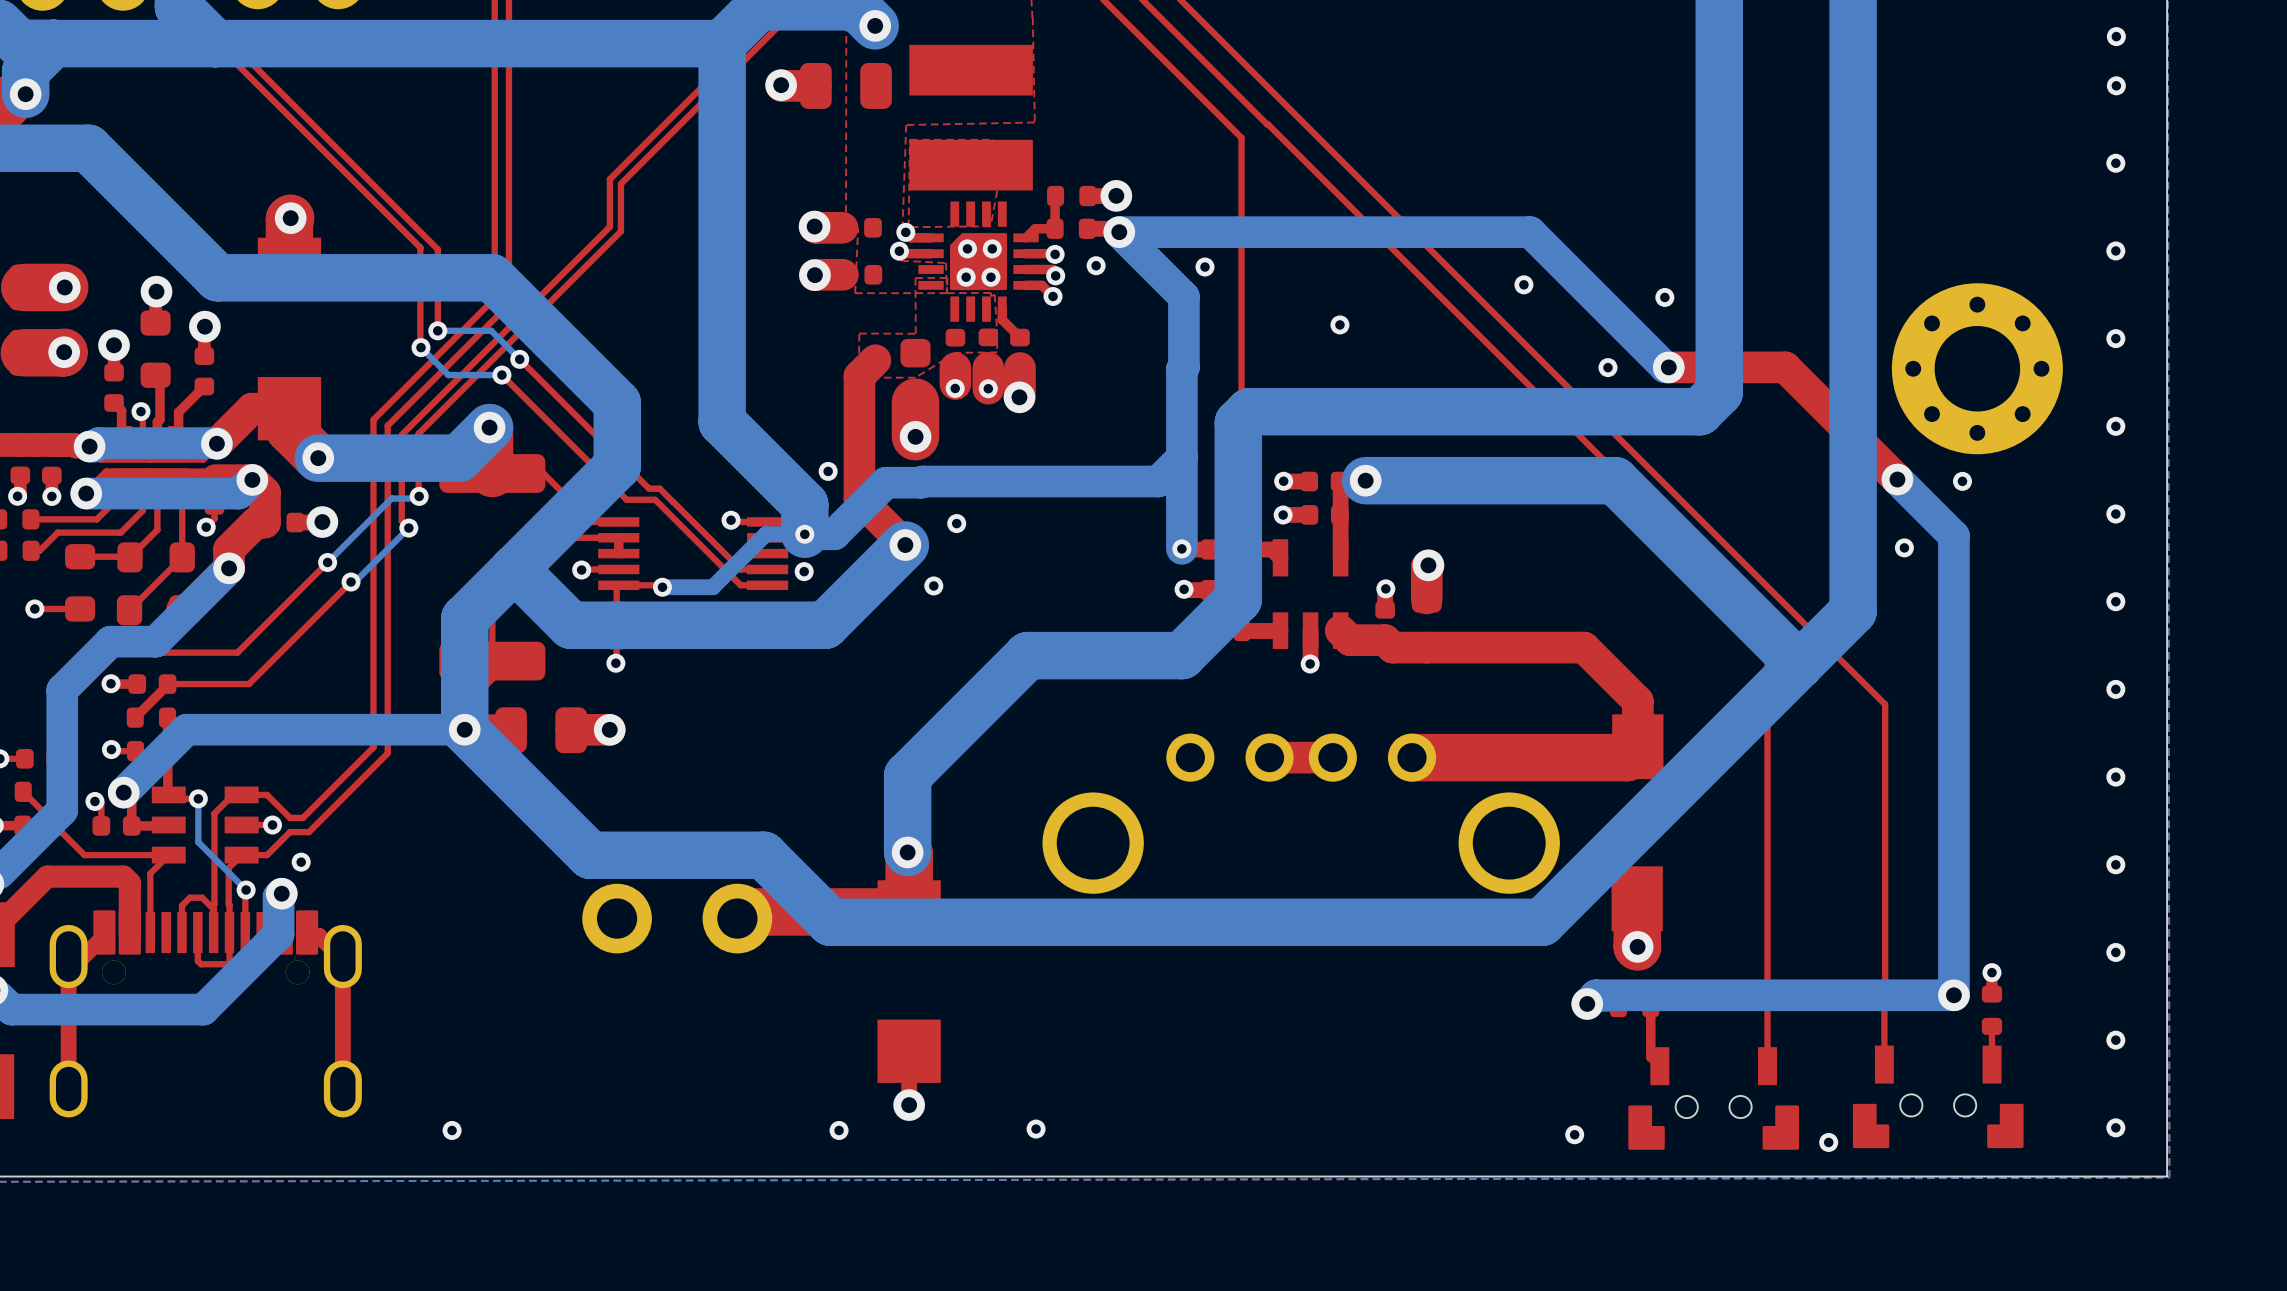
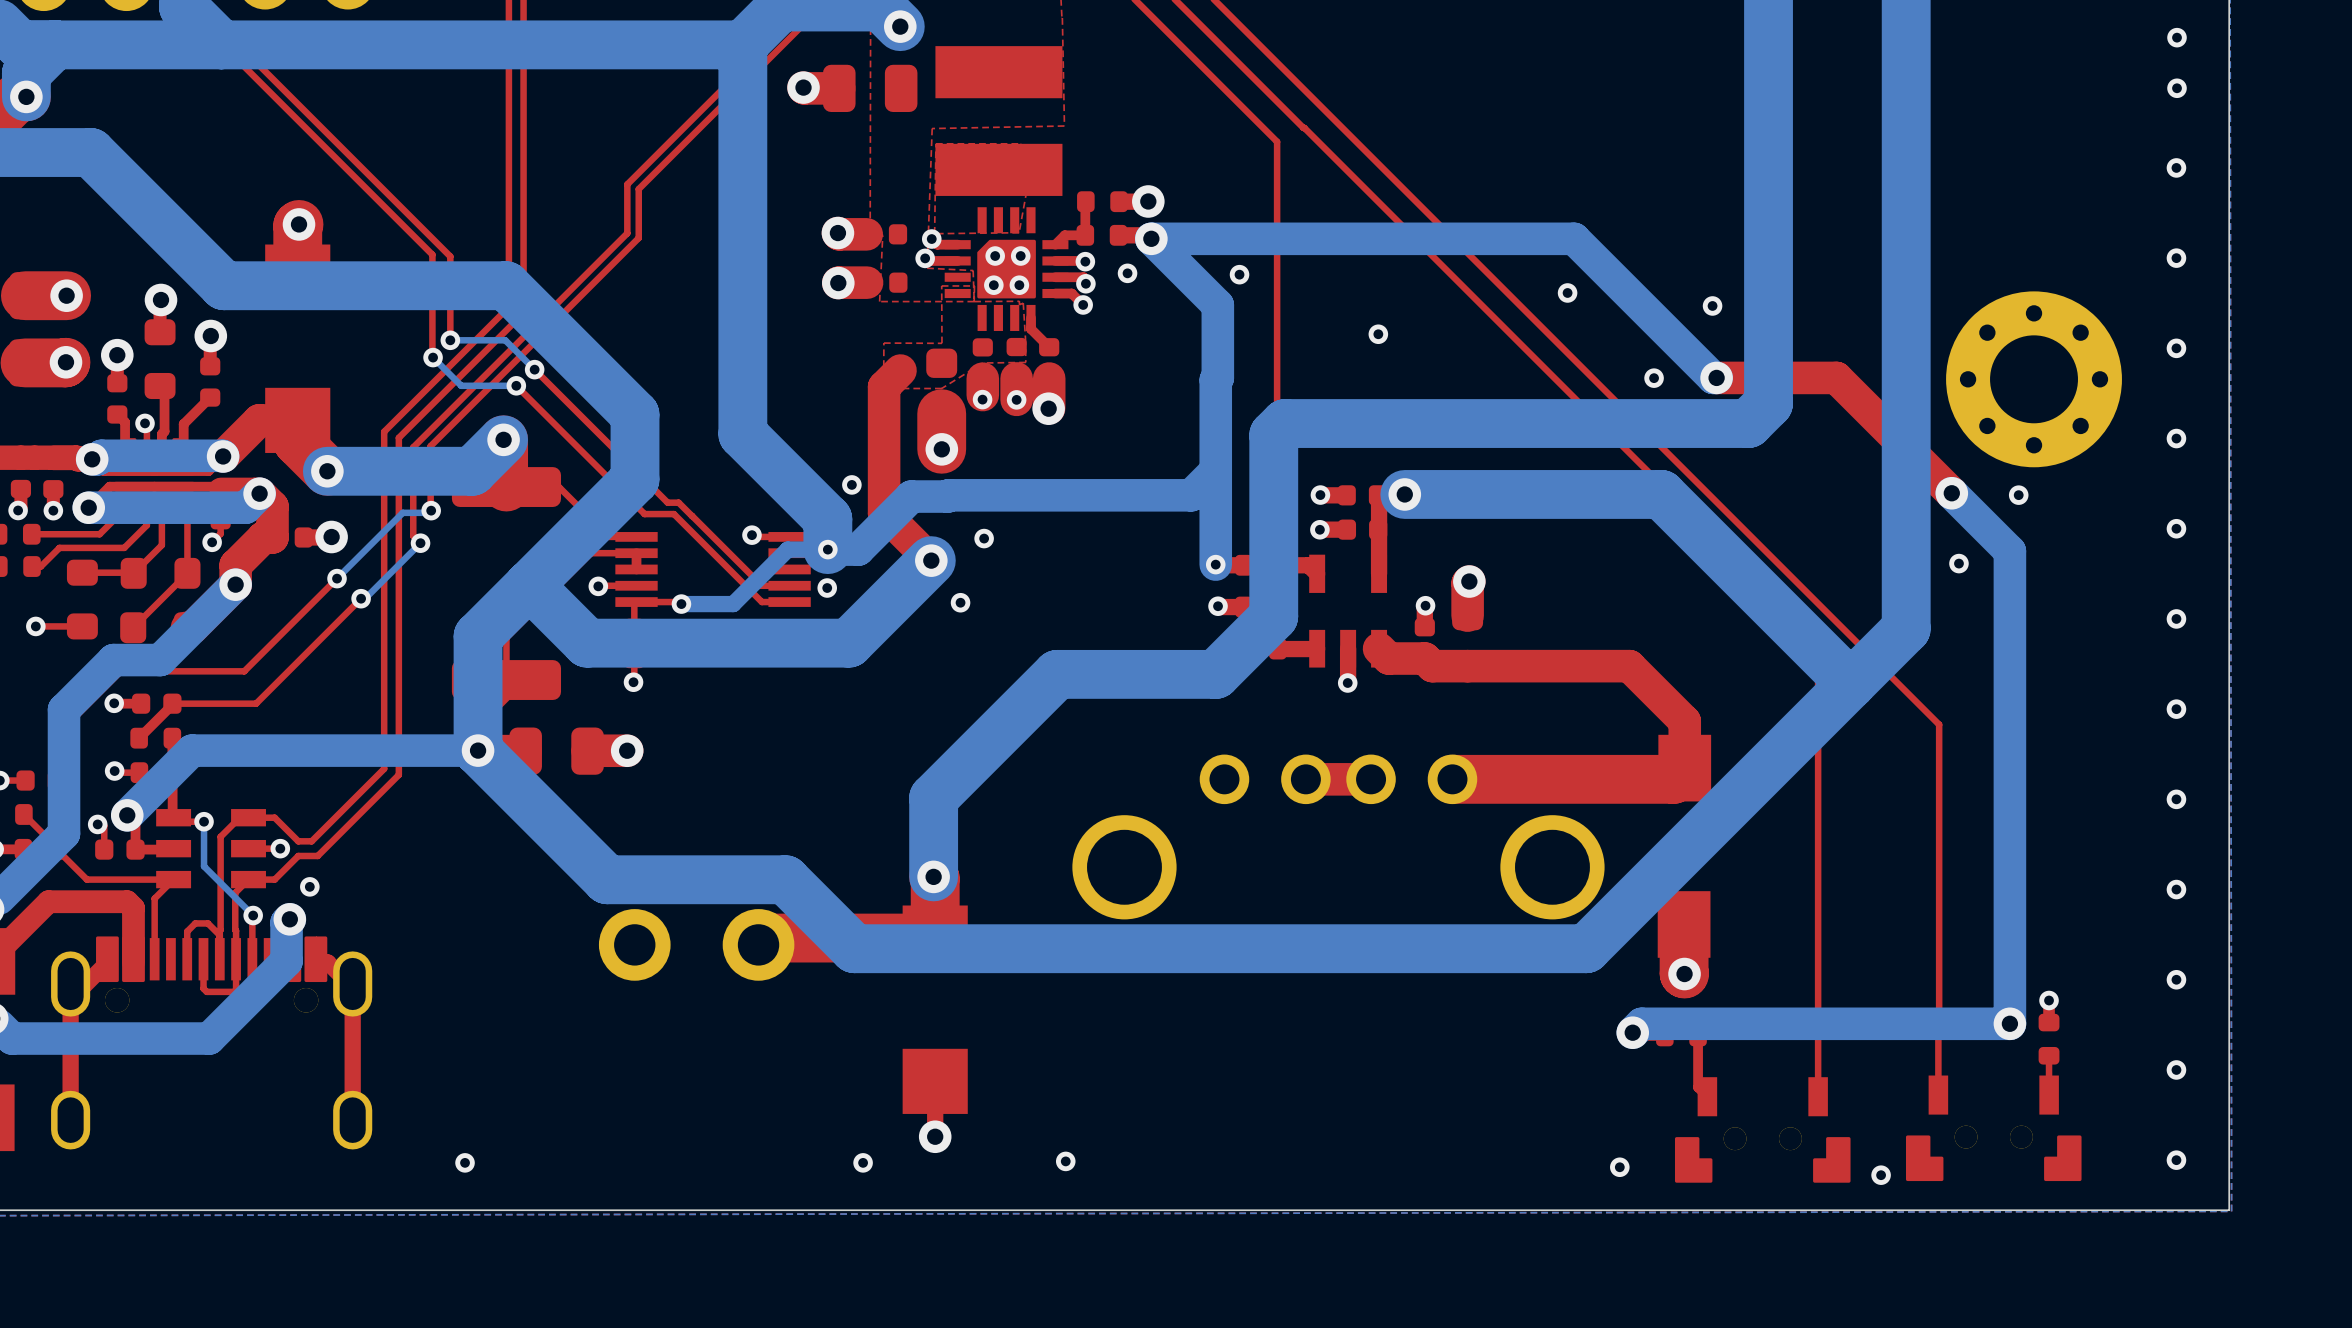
part footprint: [1852, 1045, 2024, 1149] -> [1905, 1075, 2082, 1182]
part footprint: [1628, 1047, 1800, 1150] -> [1674, 1077, 1851, 1183]

